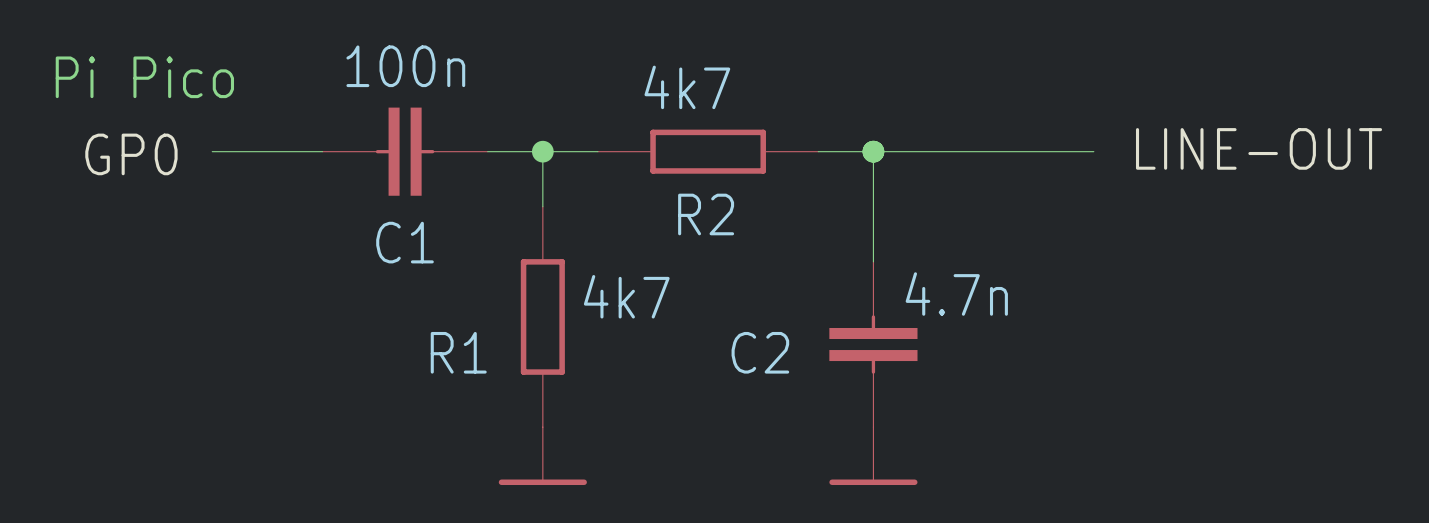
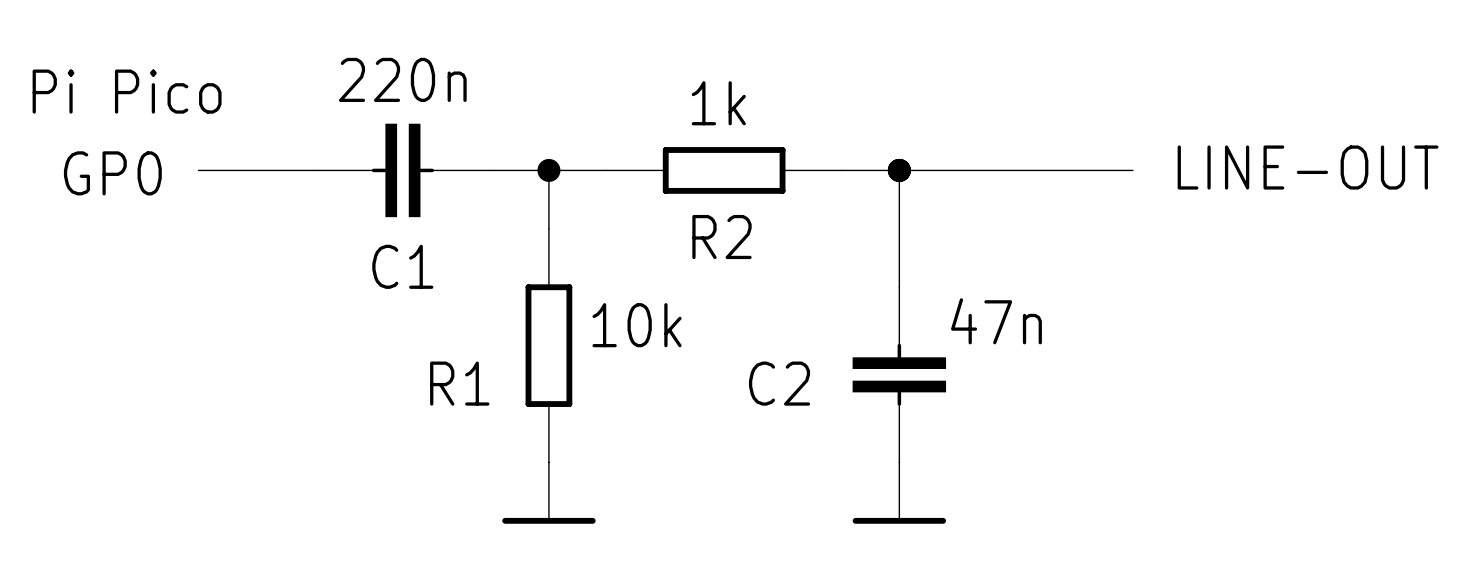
C1 value: 100n (405, 66) -> 220n (402, 79)
R2 value: 4k7 (687, 87) -> 1k (718, 103)
C2 value: 4.7n (956, 294) -> 47n (996, 321)
R1 value: 4k7 (626, 296) -> 10k (637, 325)

